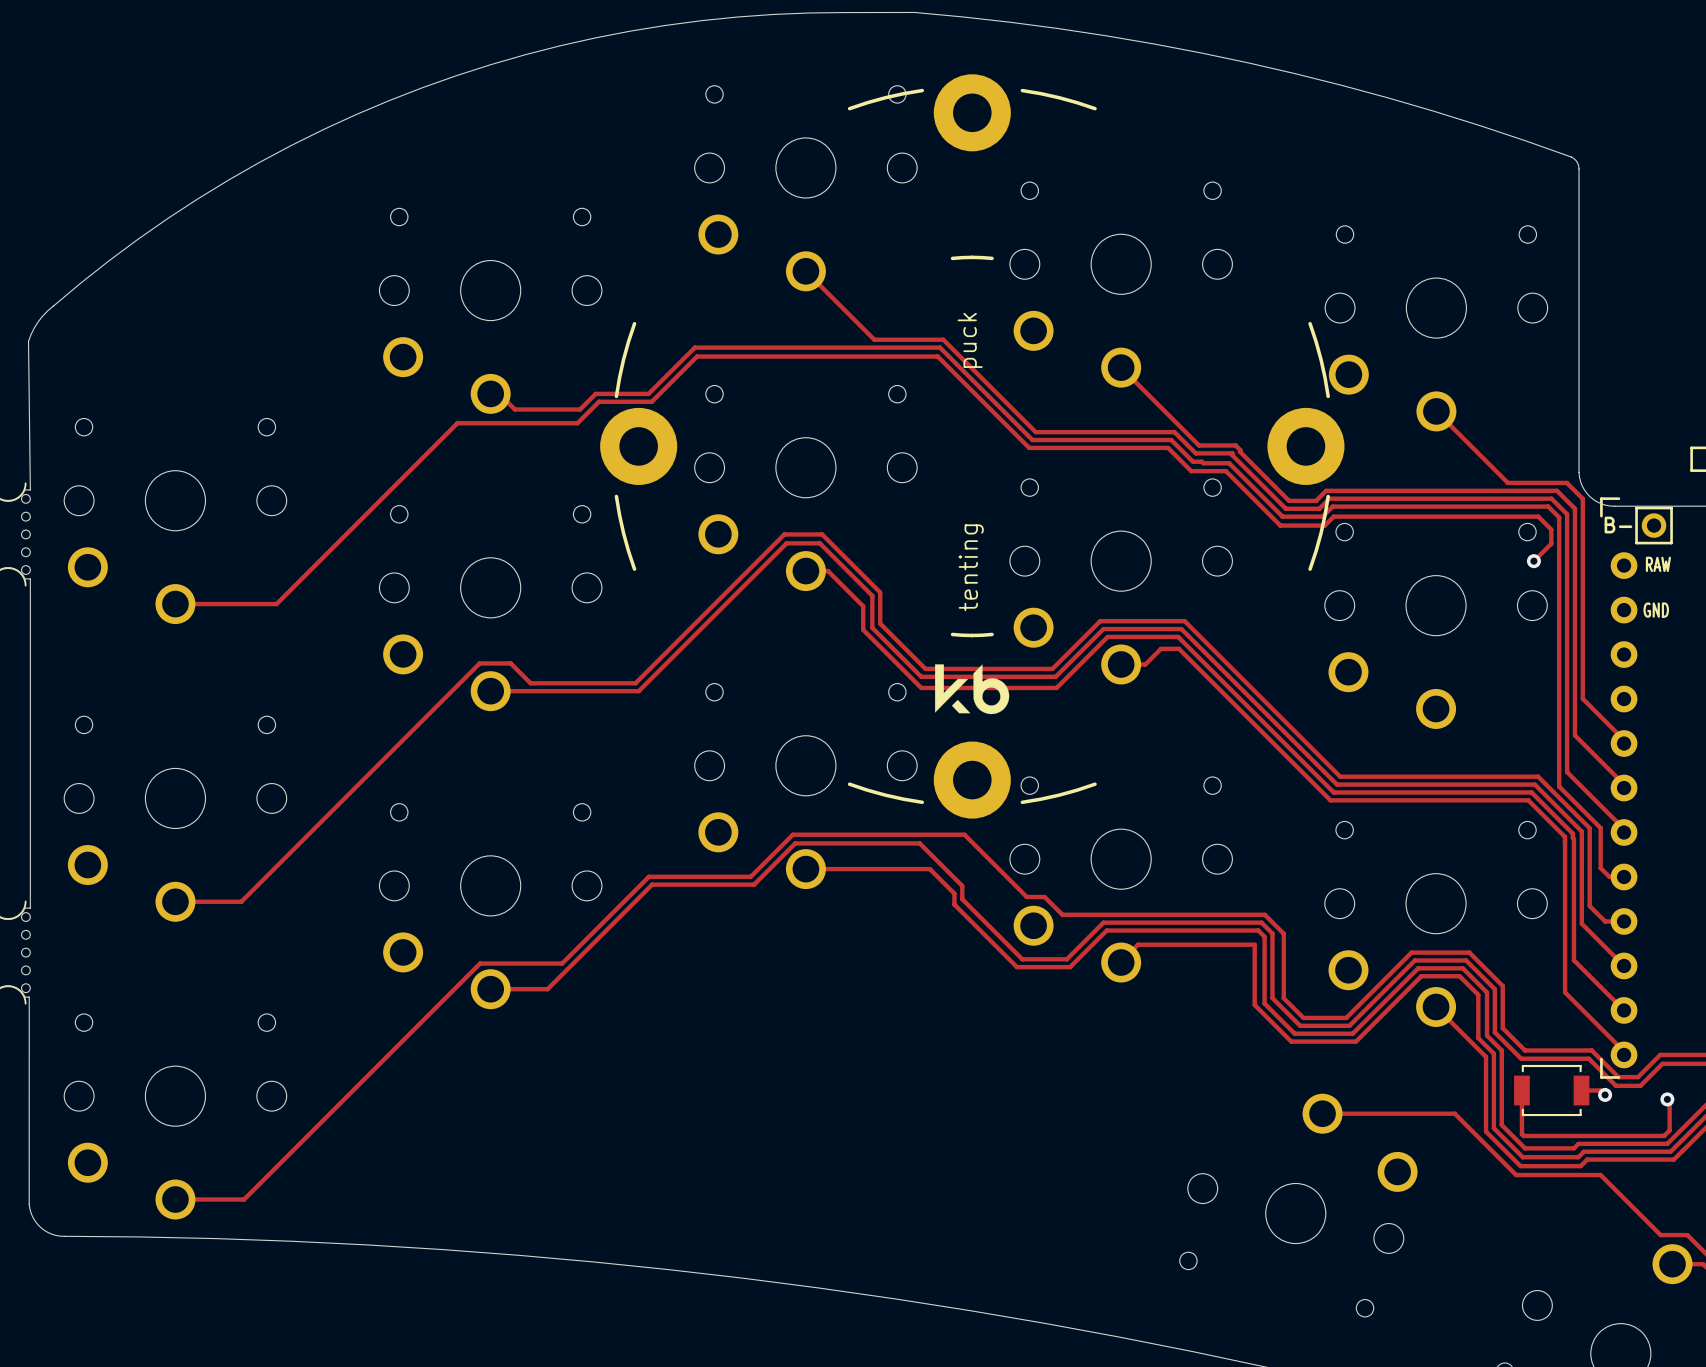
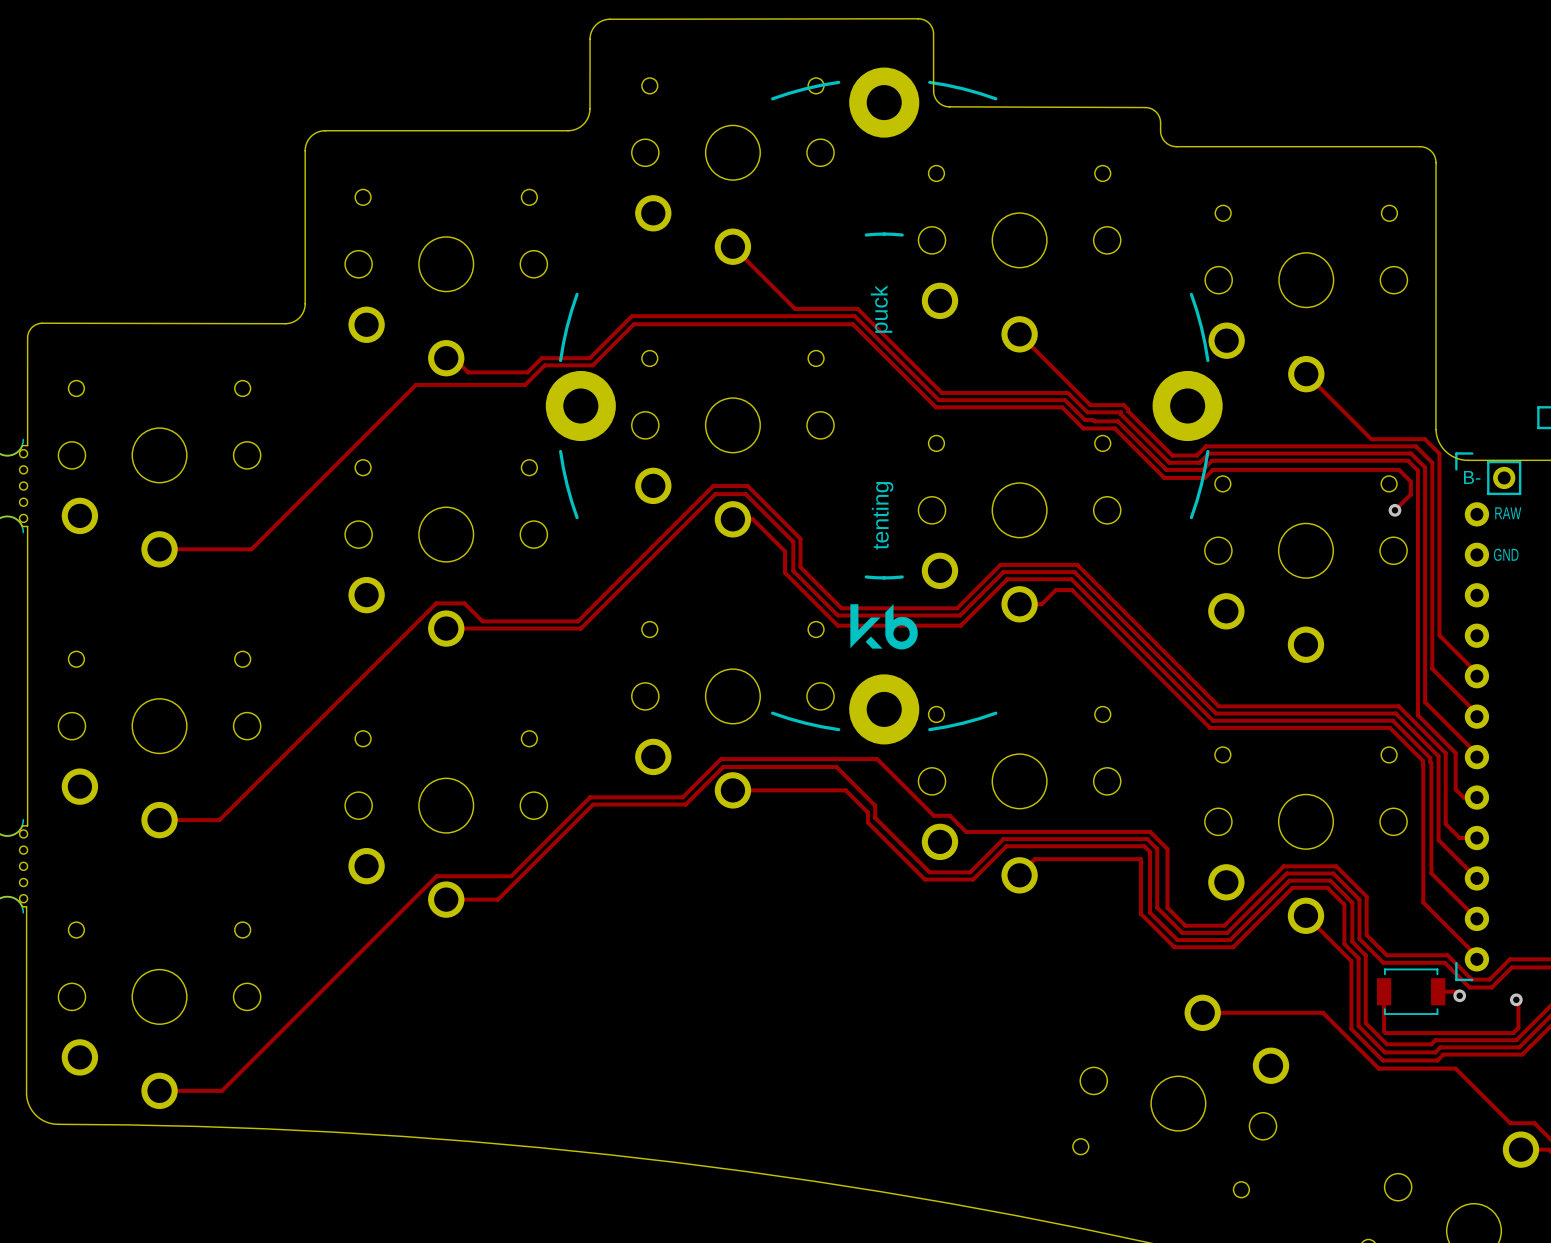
board edge: (1579, 472) (1579, 168) (1577, 163) (1572, 157) (1480, 125) (1388, 97) (1247, 62) (1153, 43) (1010, 22) (914, 12) (809, 12) (737, 16) (630, 31) (560, 45) (491, 64) (422, 87) (356, 114) (259, 162) (197, 198) (109, 260) (47, 310) (34, 327) (28, 341) (30, 489) -> (1435, 429) (1436, 162) (1433, 154) (1426, 148) (1420, 146) (1174, 146) (1168, 144) (1163, 139) (1159, 116) (1154, 110) (1148, 107) (946, 106) (938, 102) (933, 92) (933, 30) (929, 23) (920, 18) (609, 19) (597, 23) (590, 34) (589, 111) (585, 122) (575, 129) (325, 130) (317, 132) (311, 136) (306, 143) (305, 150) (305, 306) (301, 315) (295, 321) (285, 323) (42, 323) (33, 326) (27, 338) (27, 445)

